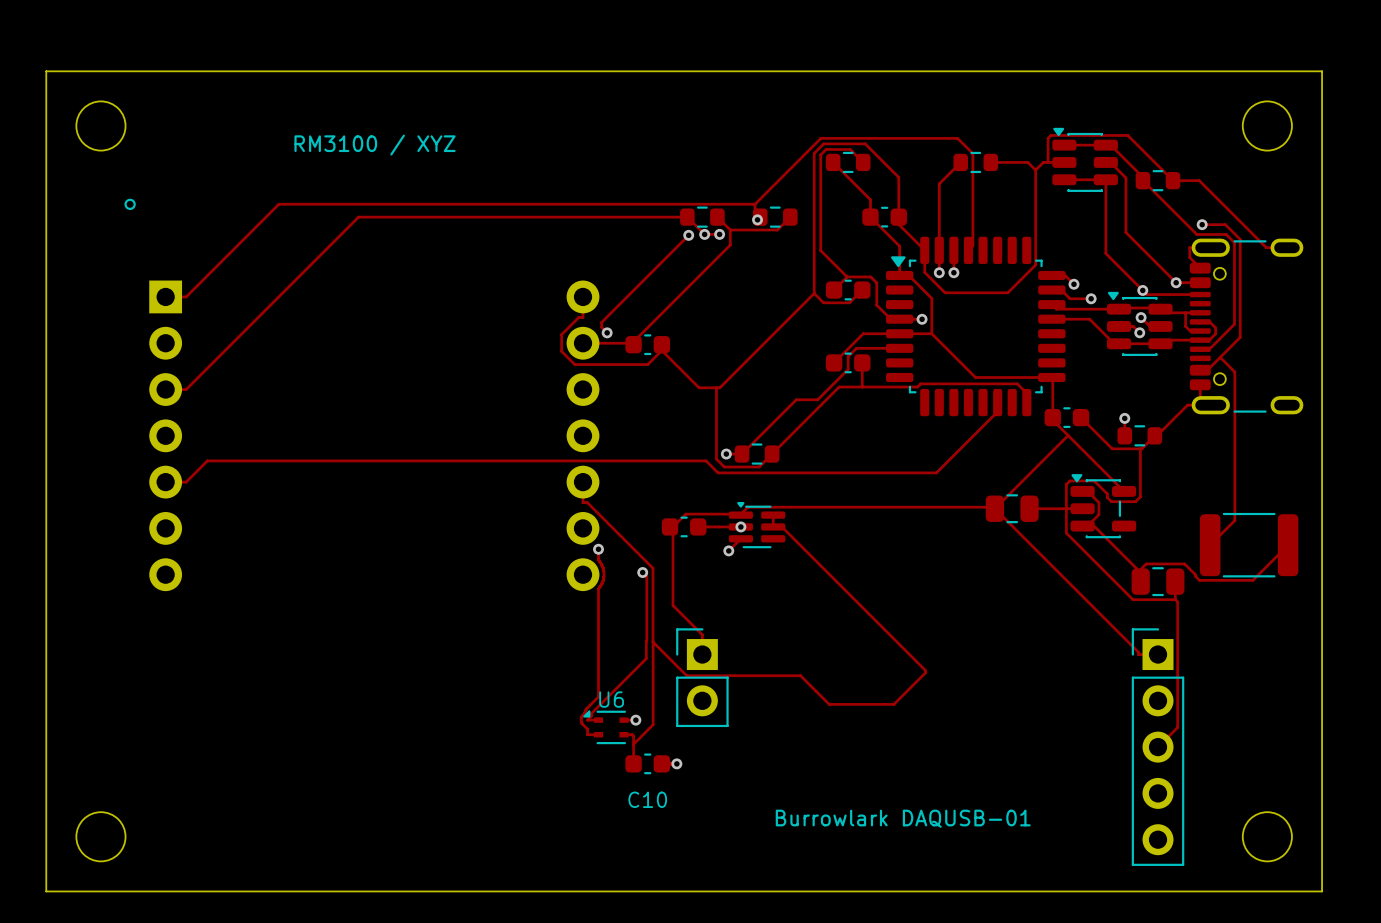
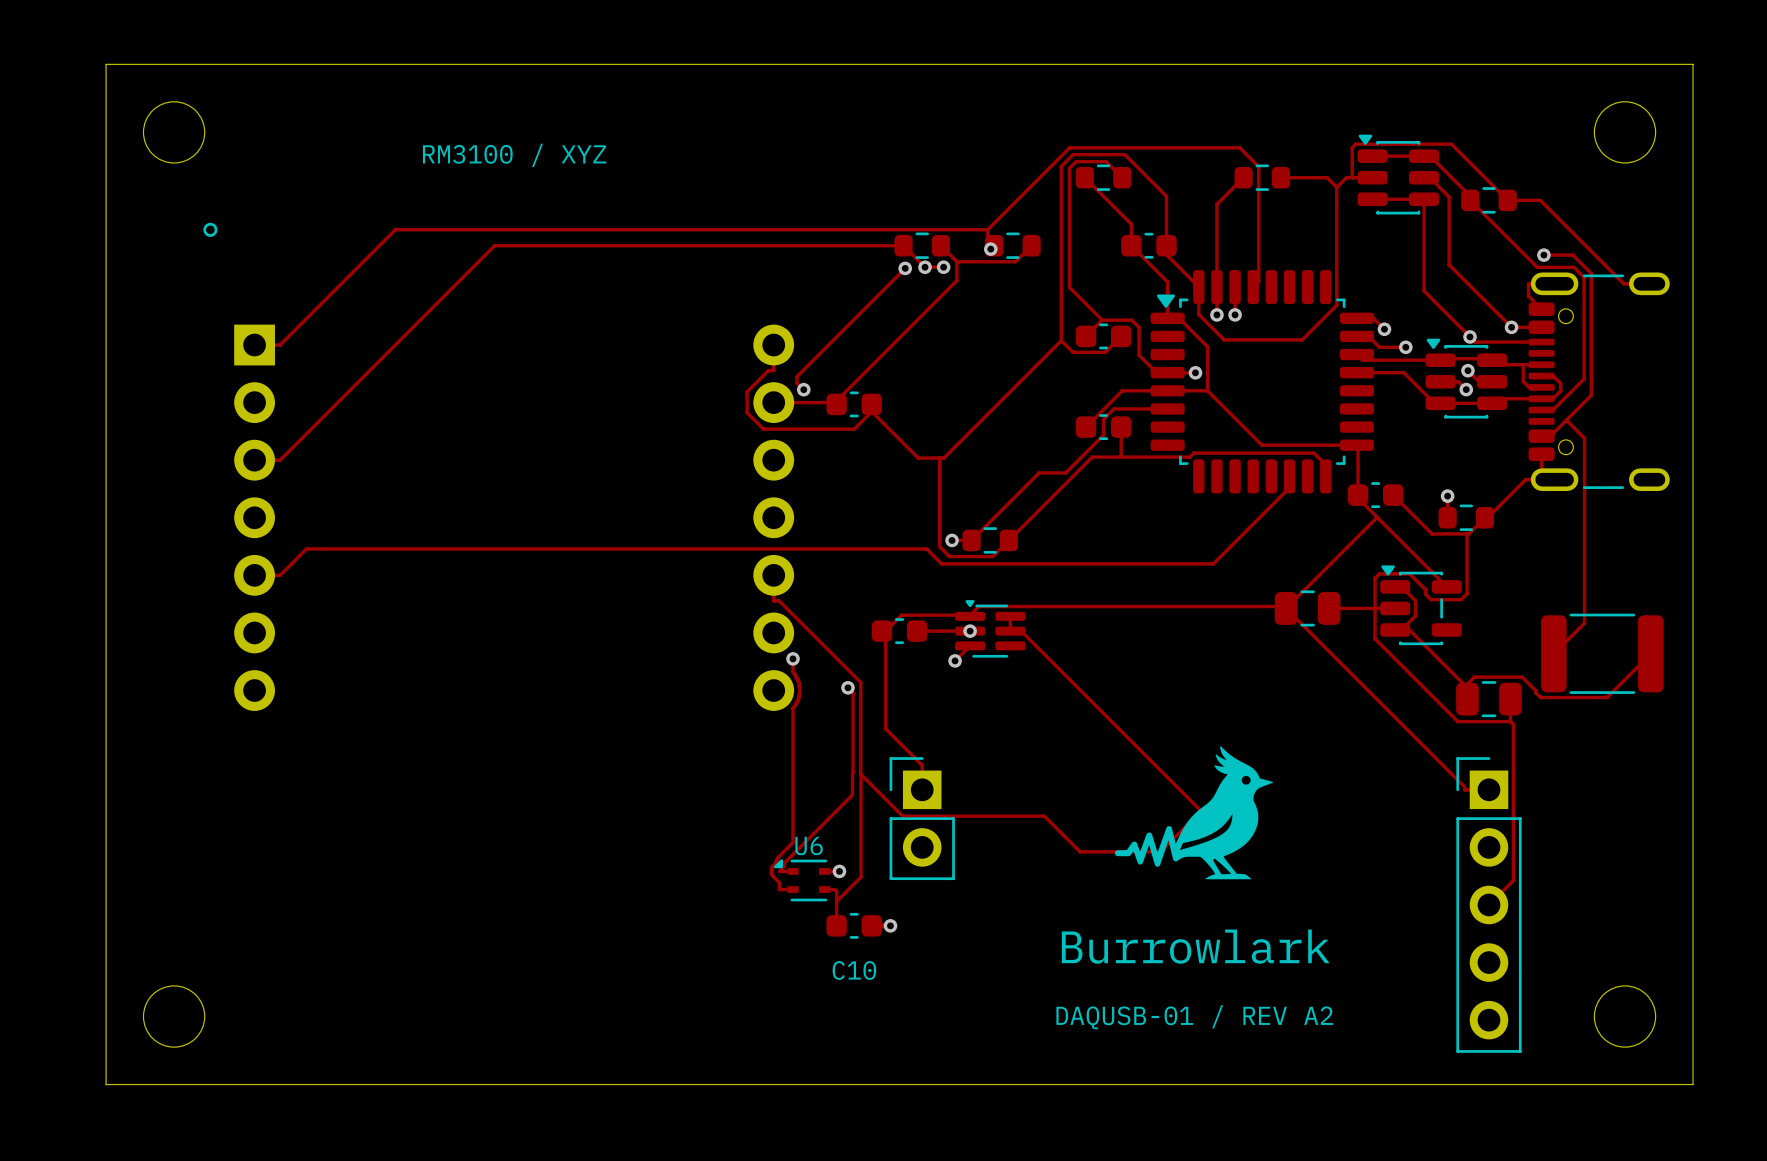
drawing: none -> [1114, 745, 1274, 880]
text: Burrowlark DAQUSB-01 (903, 818) -> Burrowlark (1195, 946)
text: none -> DAQUSB-01 / REV A2 (1194, 1017)

